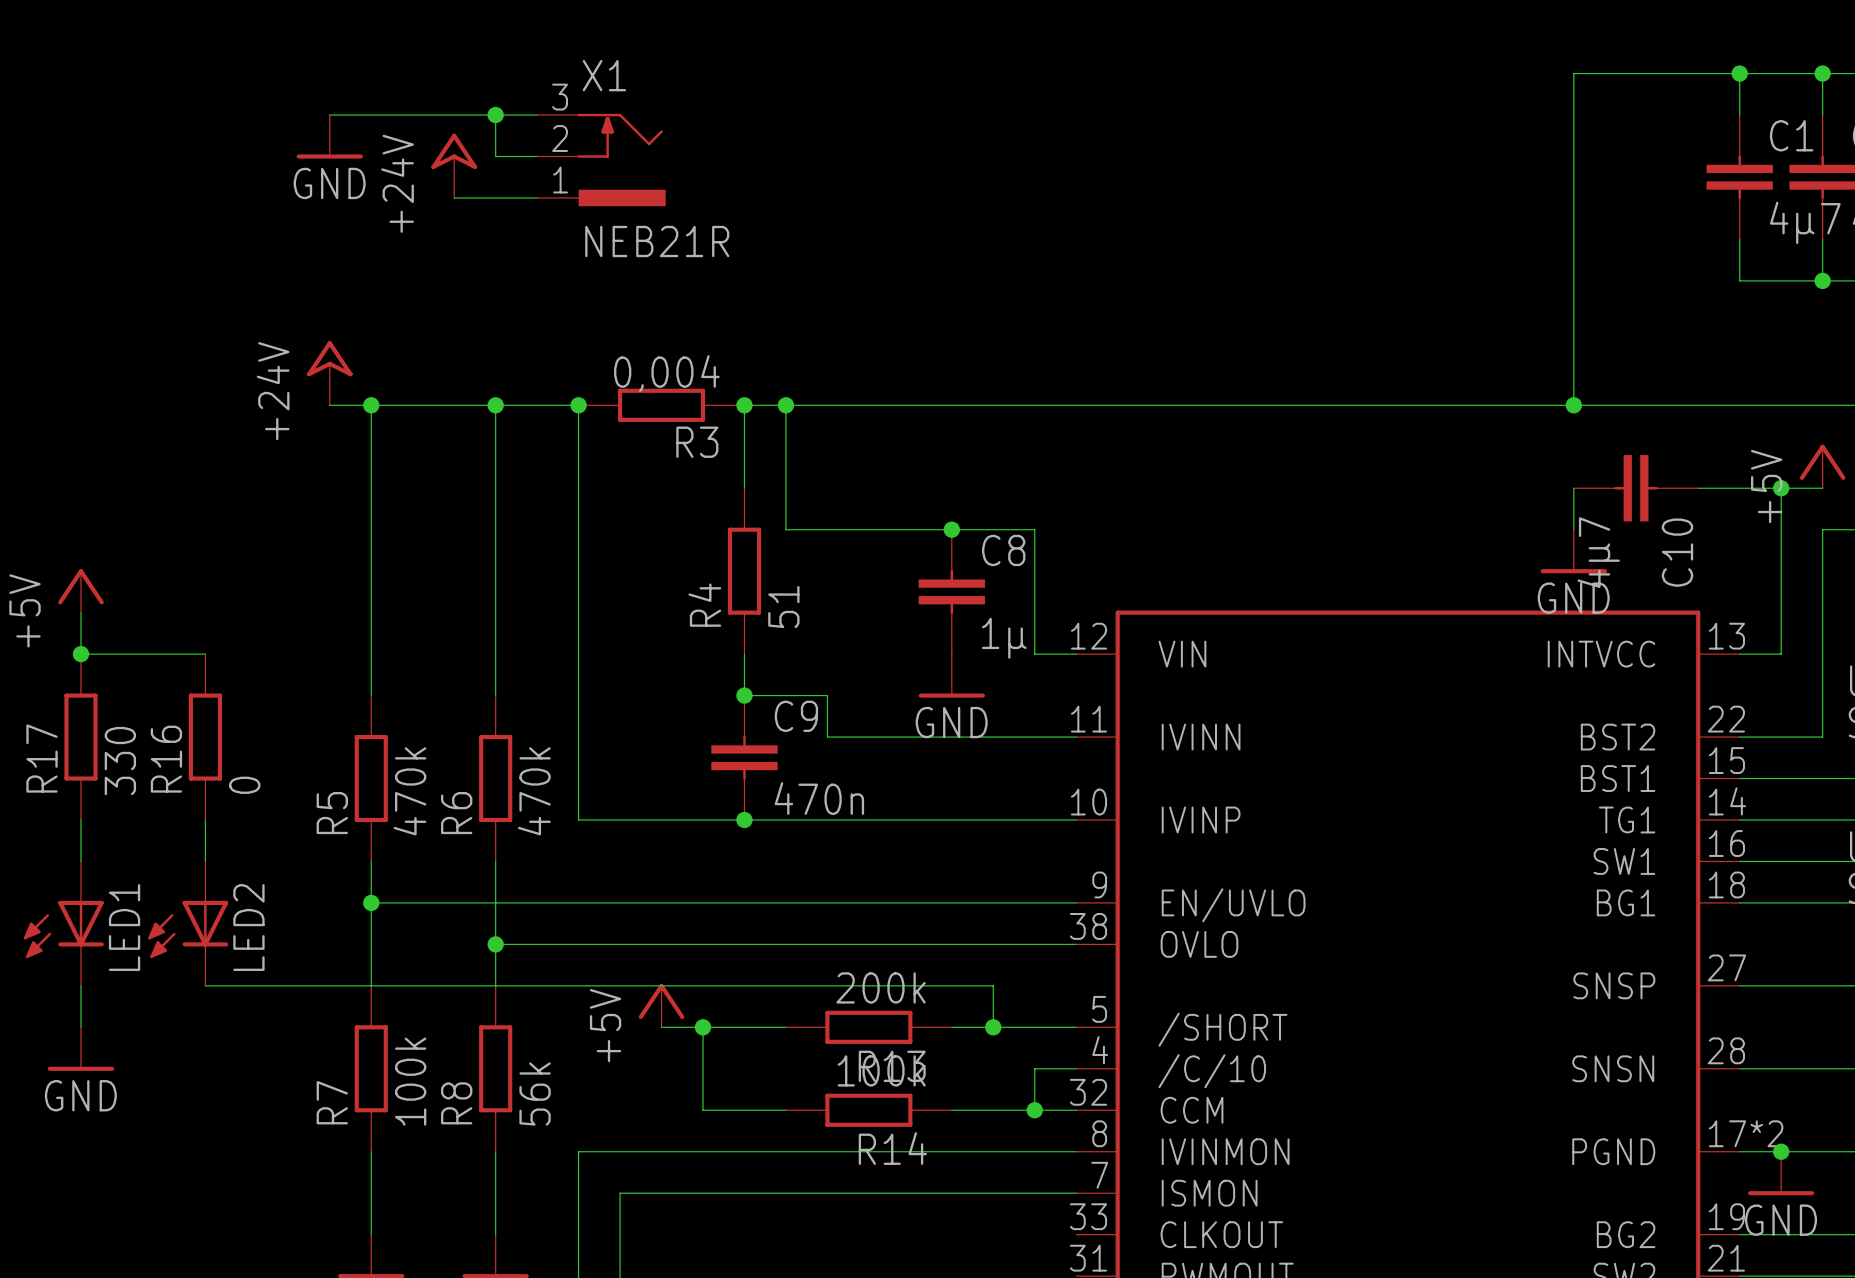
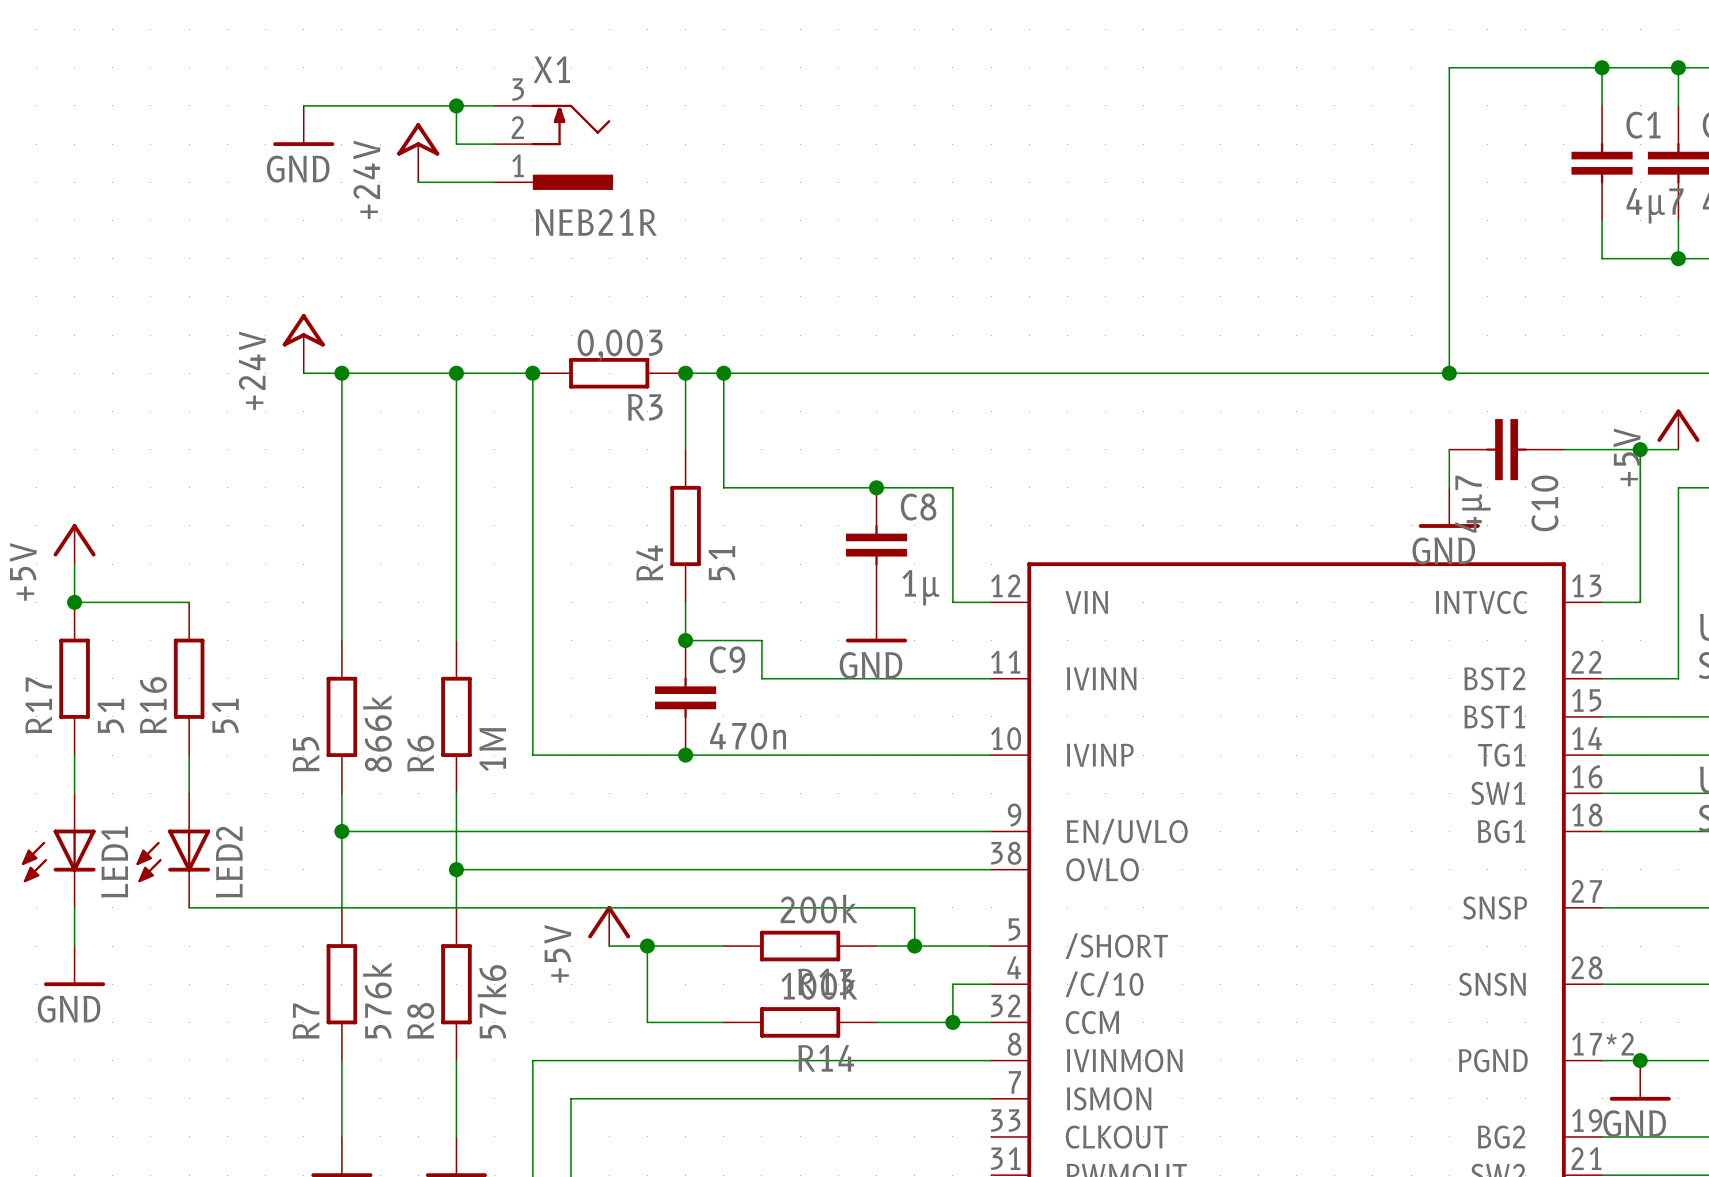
R3 value: 0,004 (666, 373) -> 0,003 (620, 345)
R17 value: 330 (120, 761) -> 51 (110, 715)
R16 value: 0 (244, 785) -> 51 (225, 715)
R5 value: 470k (409, 791) -> 866k (377, 733)
R6 value: 470k (534, 791) -> 1M (492, 749)
R7 value: 100k (410, 1081) -> 576k (377, 1000)
R8 value: 56k (535, 1094) -> 57k6 (491, 1001)

